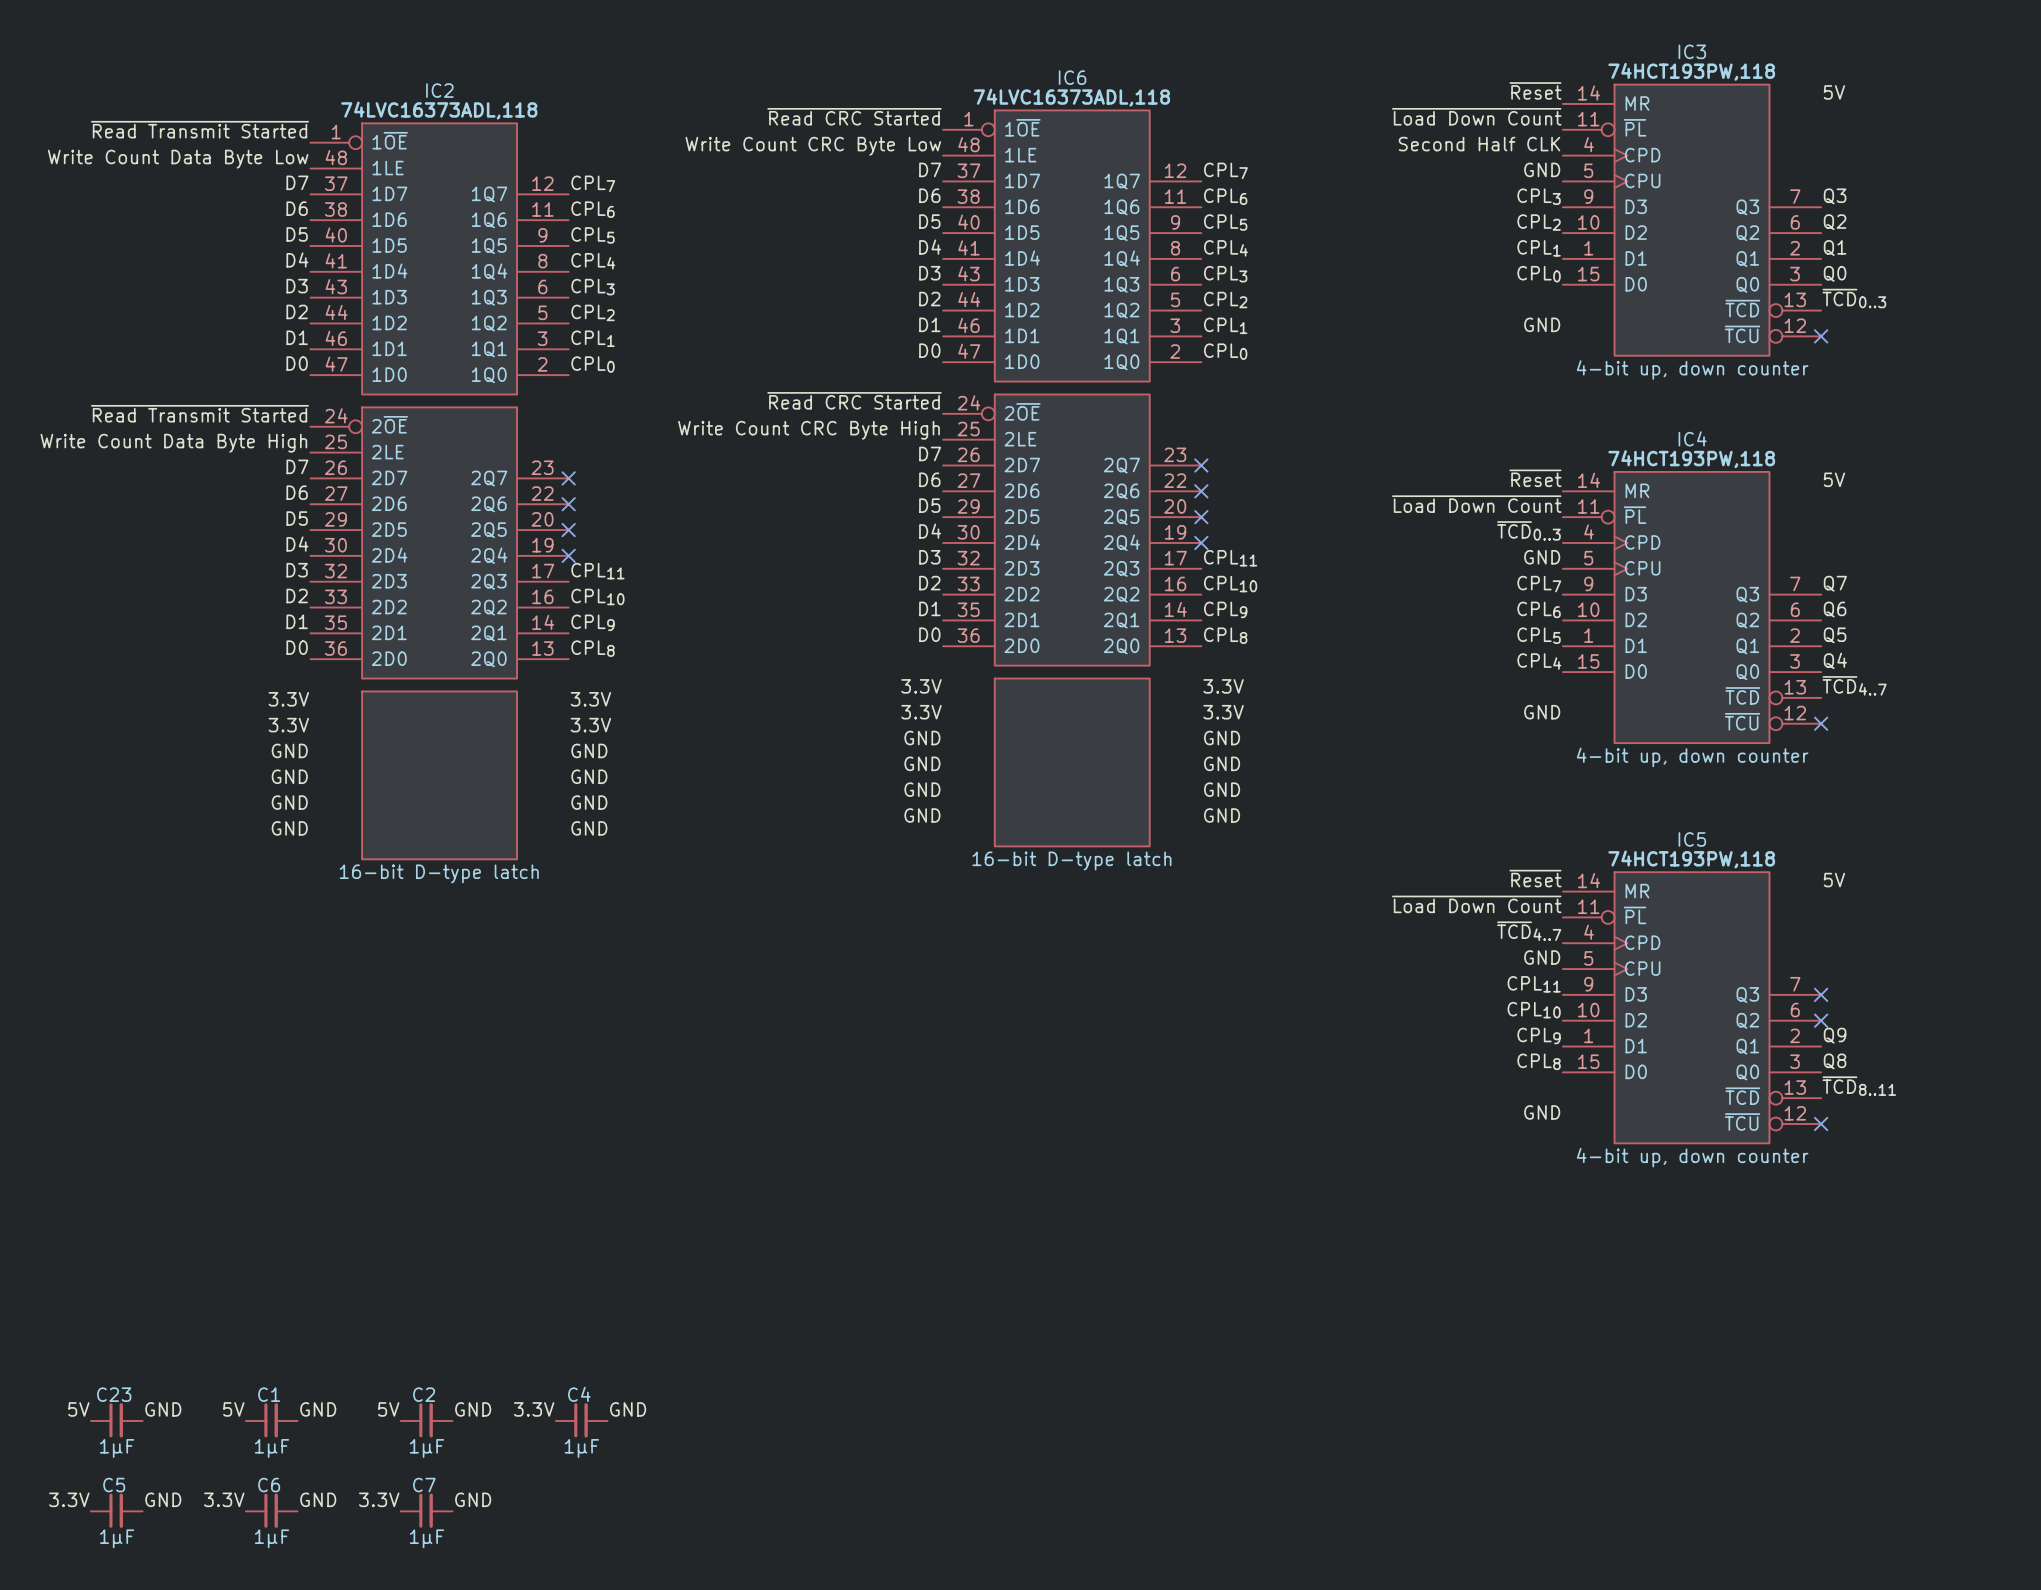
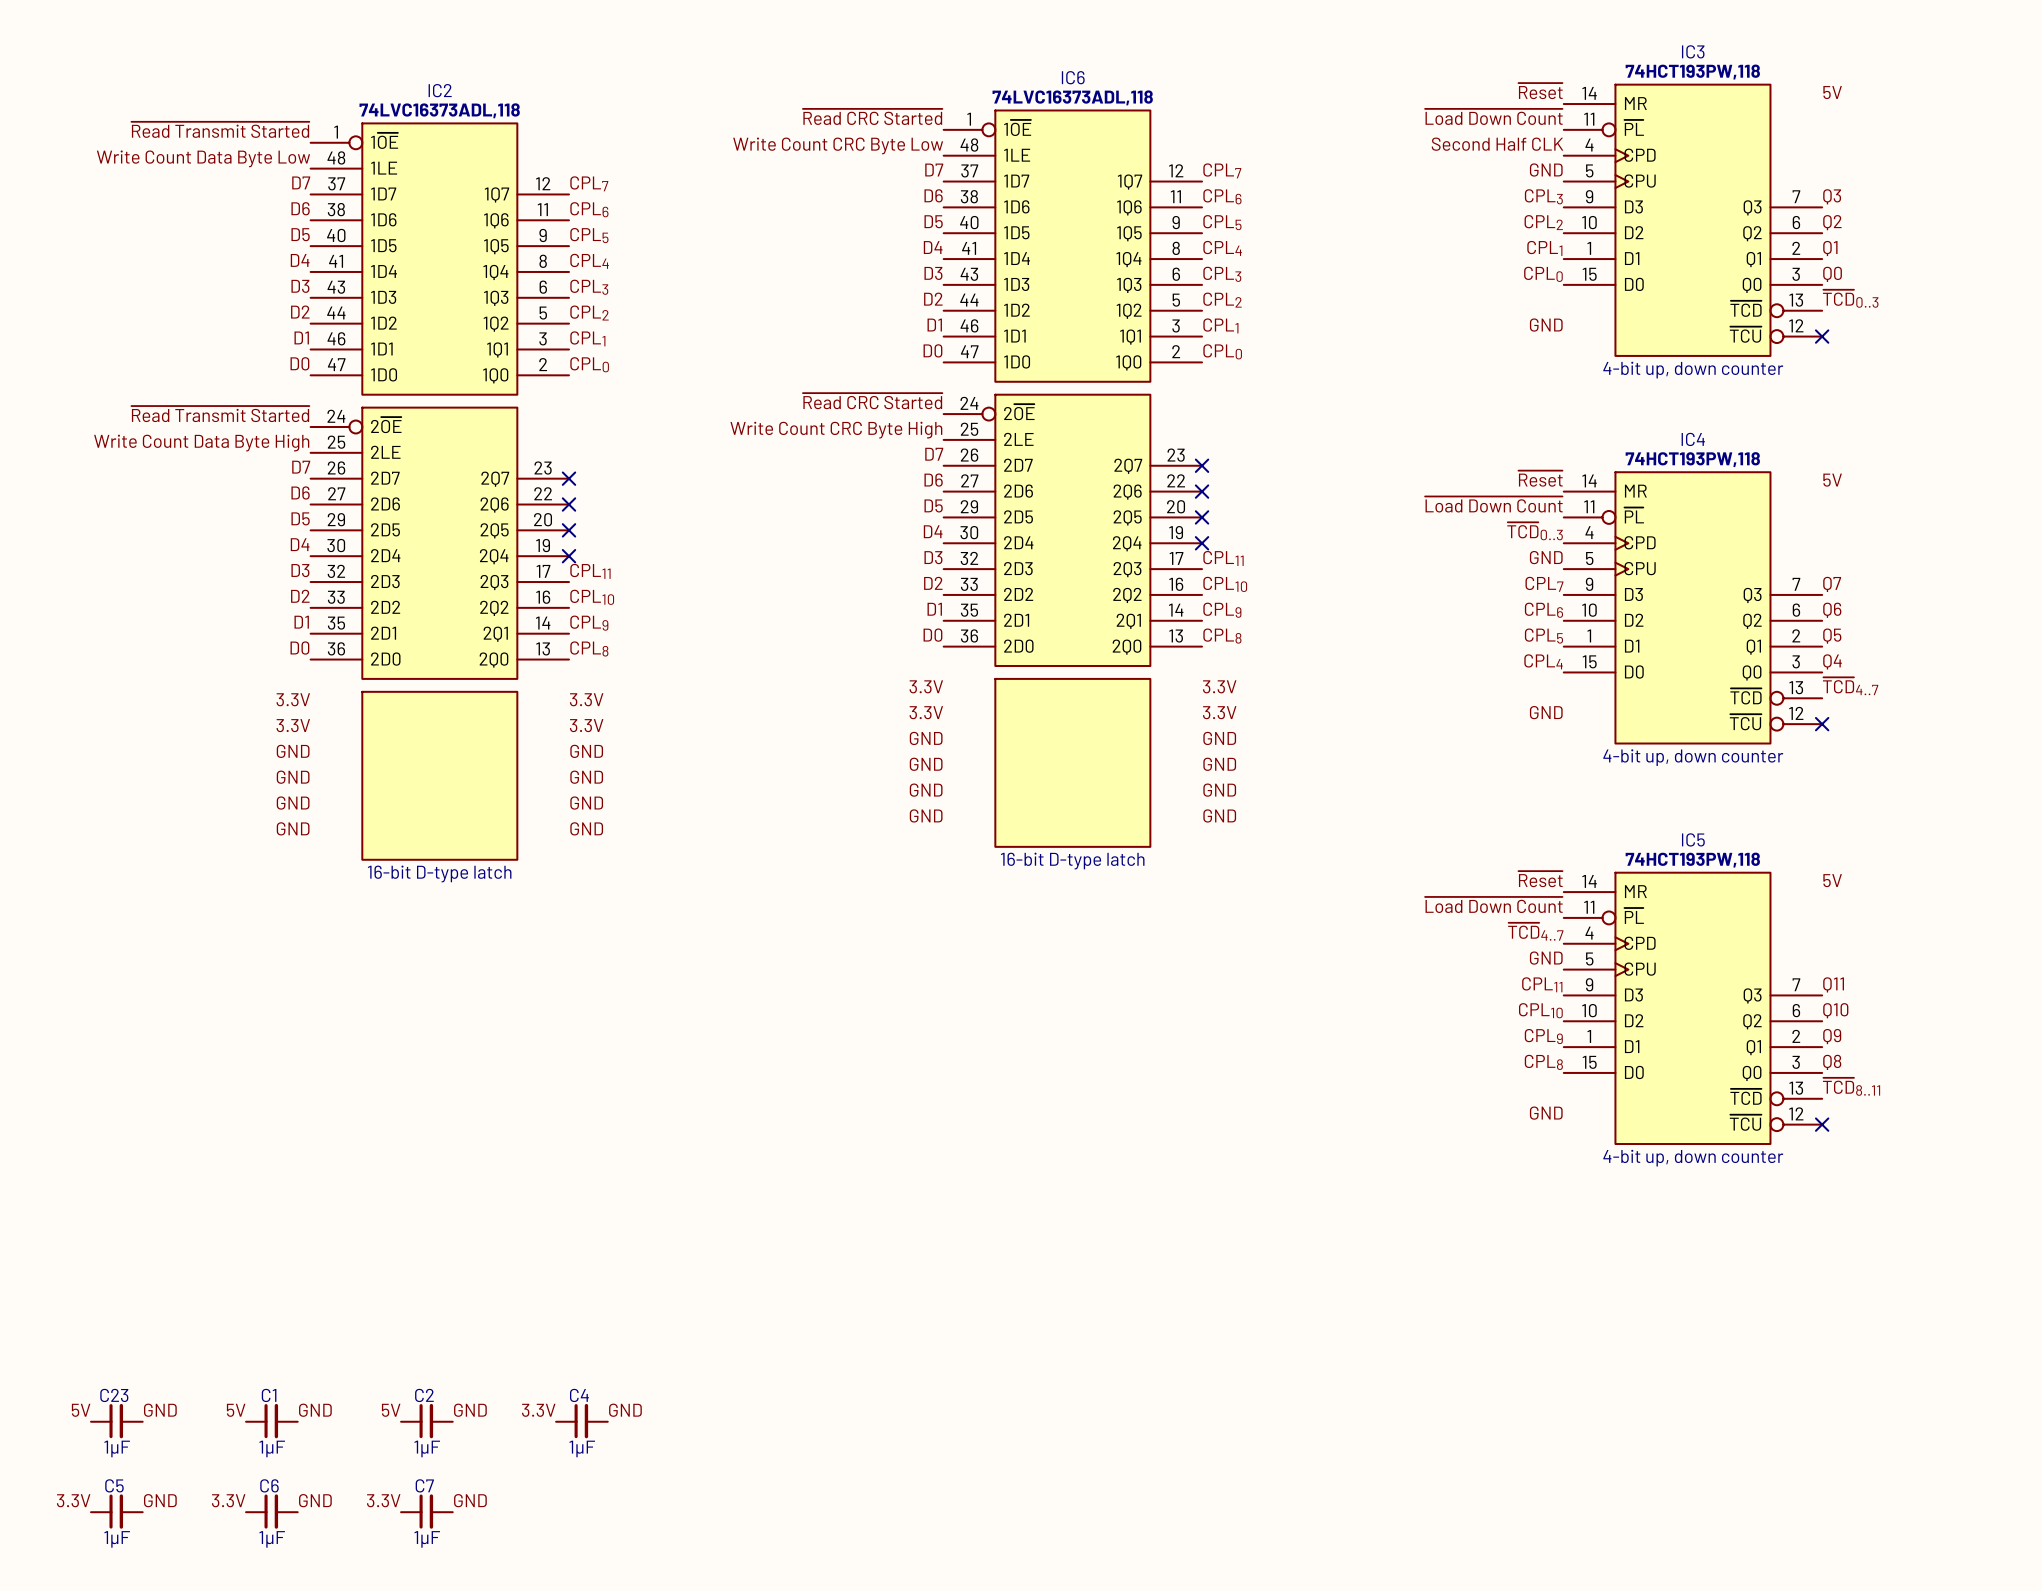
label: none -> Q11 (1833, 984)
no-connect mark: (1821, 994) -> none
label: none -> Q10 (1835, 1010)
no-connect mark: (1821, 1020) -> none

